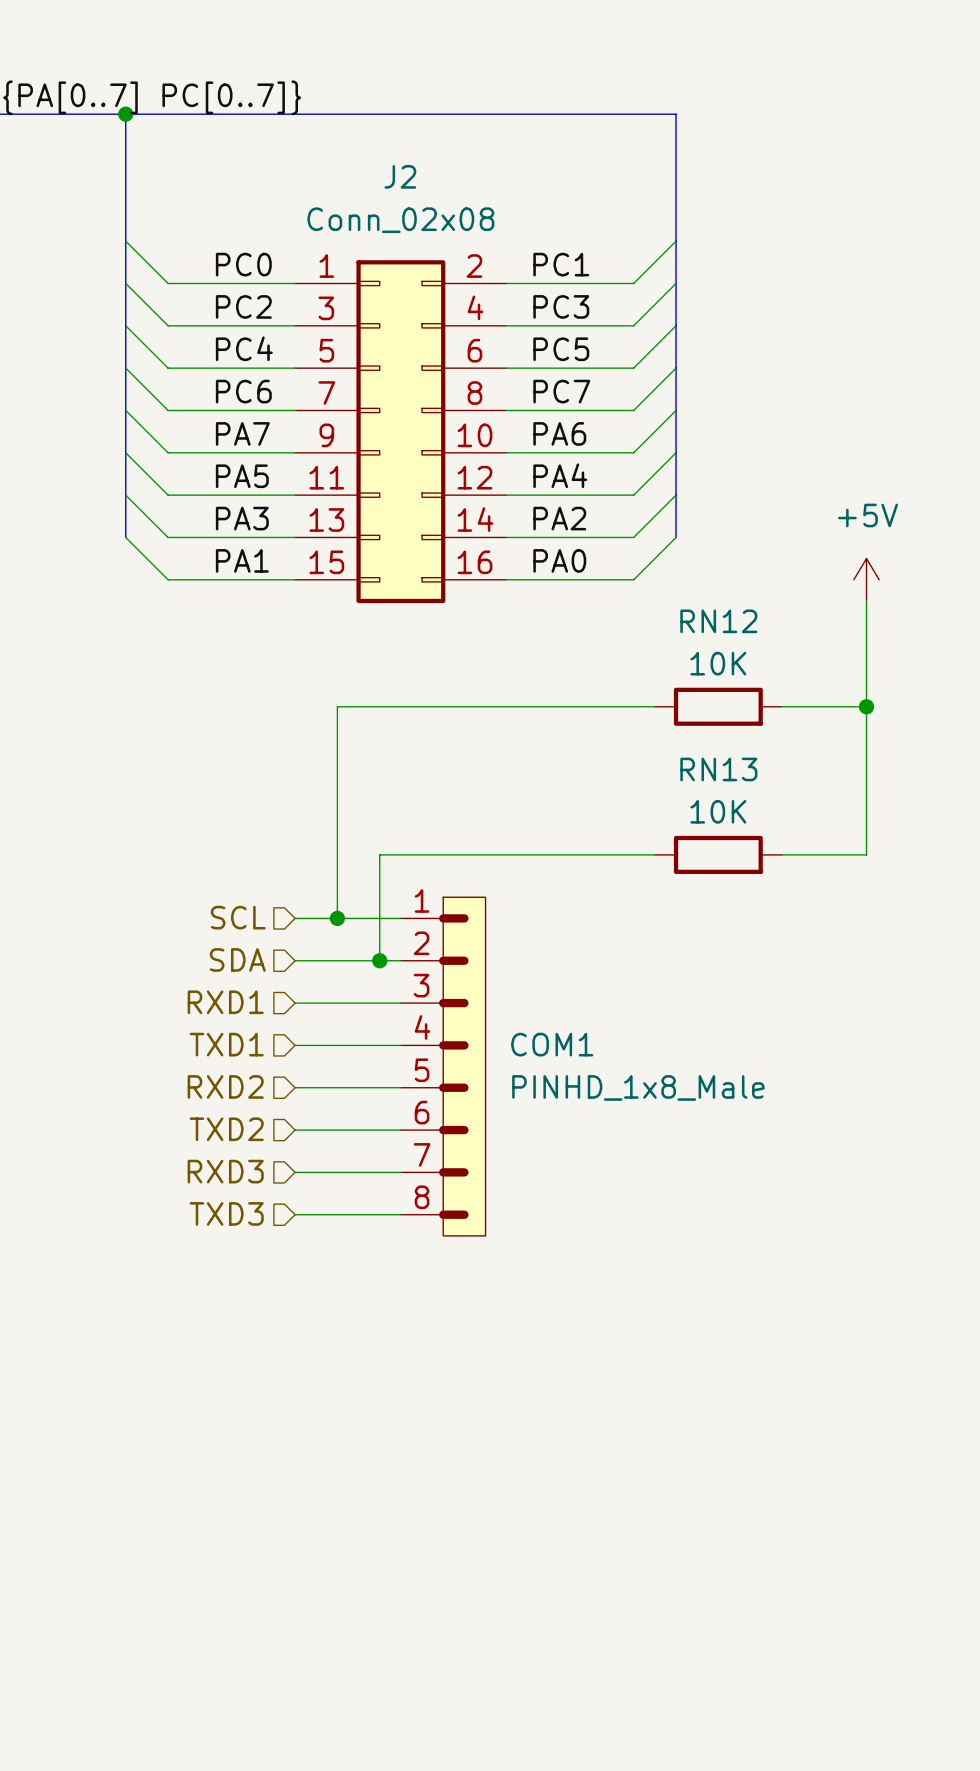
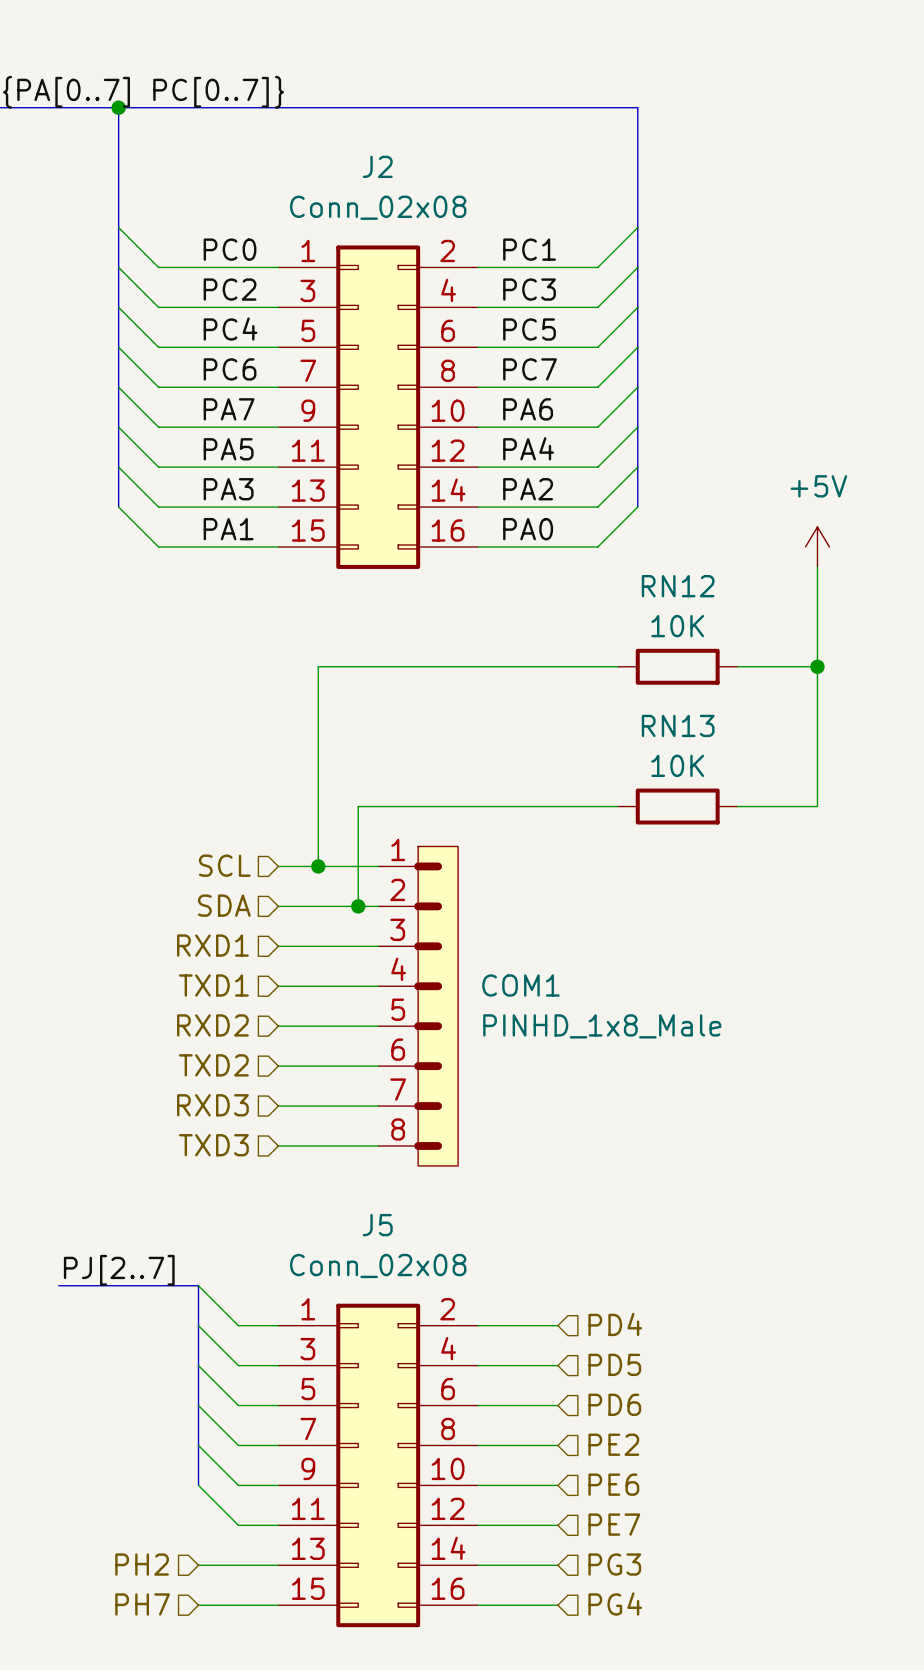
label: none -> PJ[2..7] (119, 1270)
bus: none -> (58, 1285) (198, 1285) (198, 1485)
wire: none -> (198, 1285) (238, 1325) (278, 1325)
hierarchical label: none -> PD4 (615, 1324)
wire: none -> (198, 1325) (238, 1365) (278, 1365)
wire: none -> (478, 1325) (557, 1325)
hierarchical label: none -> PD5 (614, 1364)
wire: none -> (198, 1365) (238, 1405) (278, 1405)
wire: none -> (478, 1365) (557, 1365)
wire: none -> (198, 1405) (238, 1445) (278, 1445)
wire: none -> (478, 1405) (557, 1405)
hierarchical label: none -> PD6 (614, 1404)
hierarchical label: none -> PE2 (613, 1444)
wire: none -> (198, 1445) (238, 1485) (278, 1485)
wire: none -> (478, 1445) (557, 1445)
J5: none -> Conn_02x08 (378, 1465)
hierarchical label: none -> PE6 (613, 1484)
wire: none -> (198, 1485) (238, 1525) (278, 1525)
wire: none -> (478, 1485) (557, 1485)
wire: none -> (478, 1525) (557, 1525)
hierarchical label: none -> PE7 (614, 1524)
hierarchical label: none -> PH2 (142, 1564)
hierarchical label: none -> PG3 (614, 1564)
wire: none -> (198, 1565) (278, 1565)
wire: none -> (478, 1565) (557, 1565)
hierarchical label: none -> PH7 (142, 1604)
hierarchical label: none -> PG4 (615, 1603)
wire: none -> (198, 1605) (278, 1605)
wire: none -> (478, 1605) (557, 1605)

